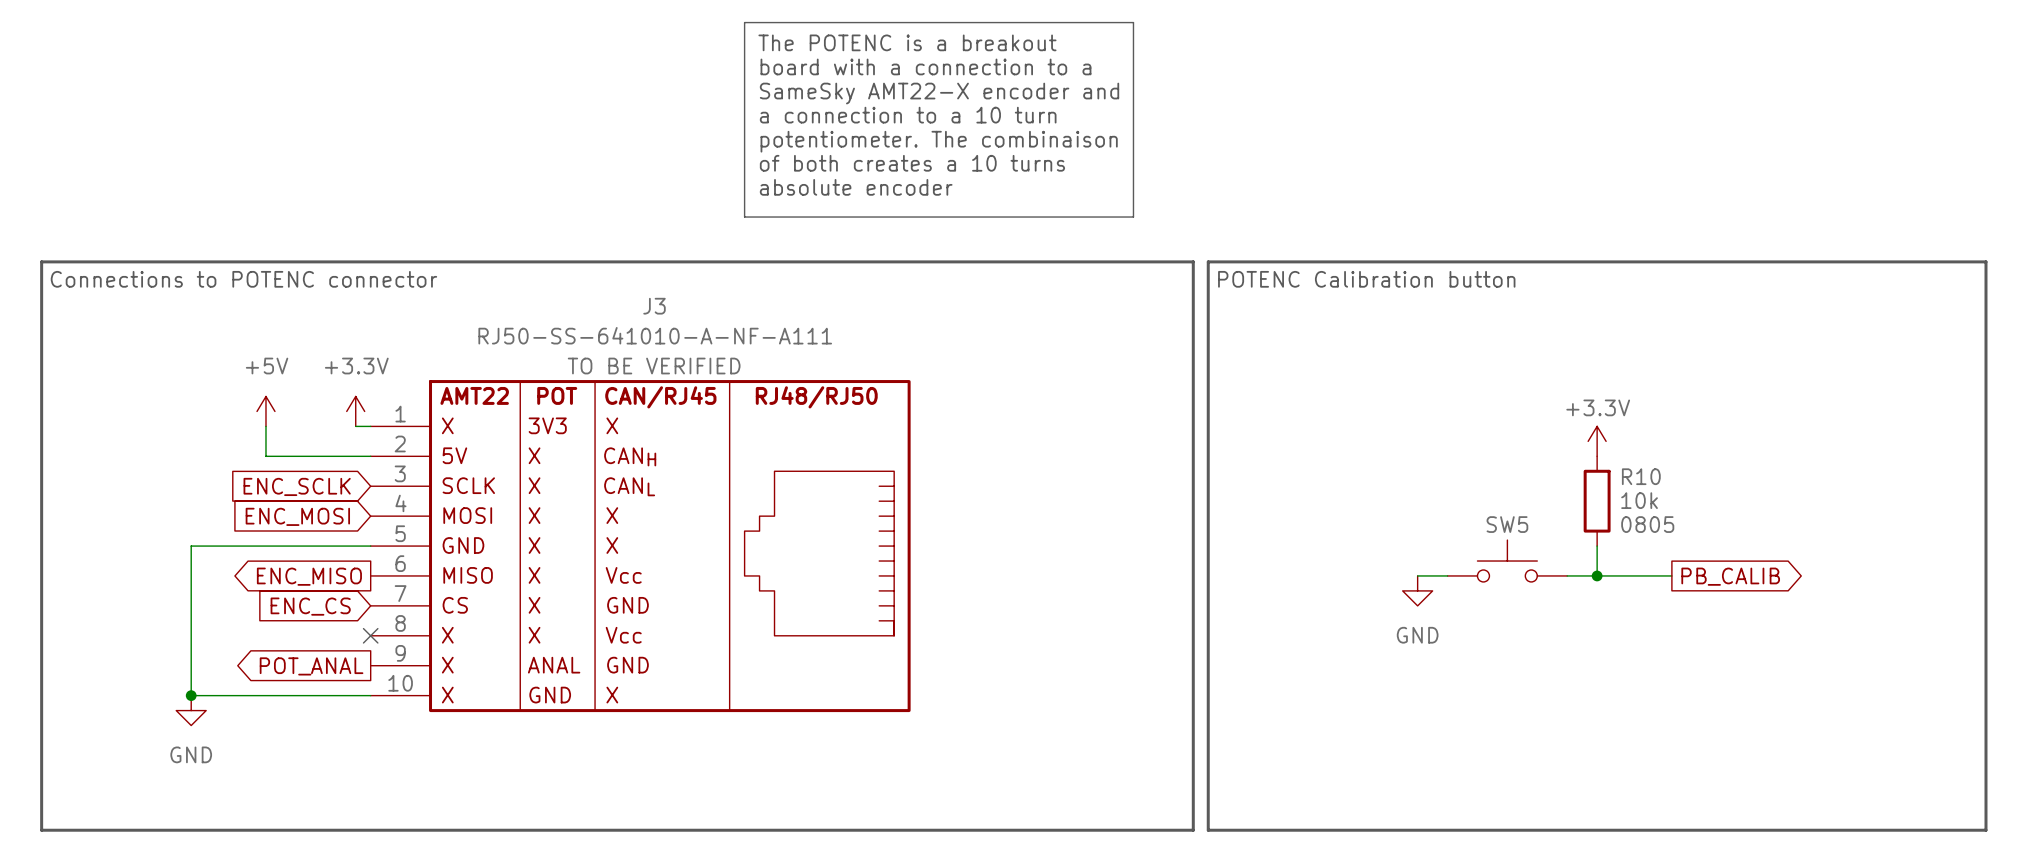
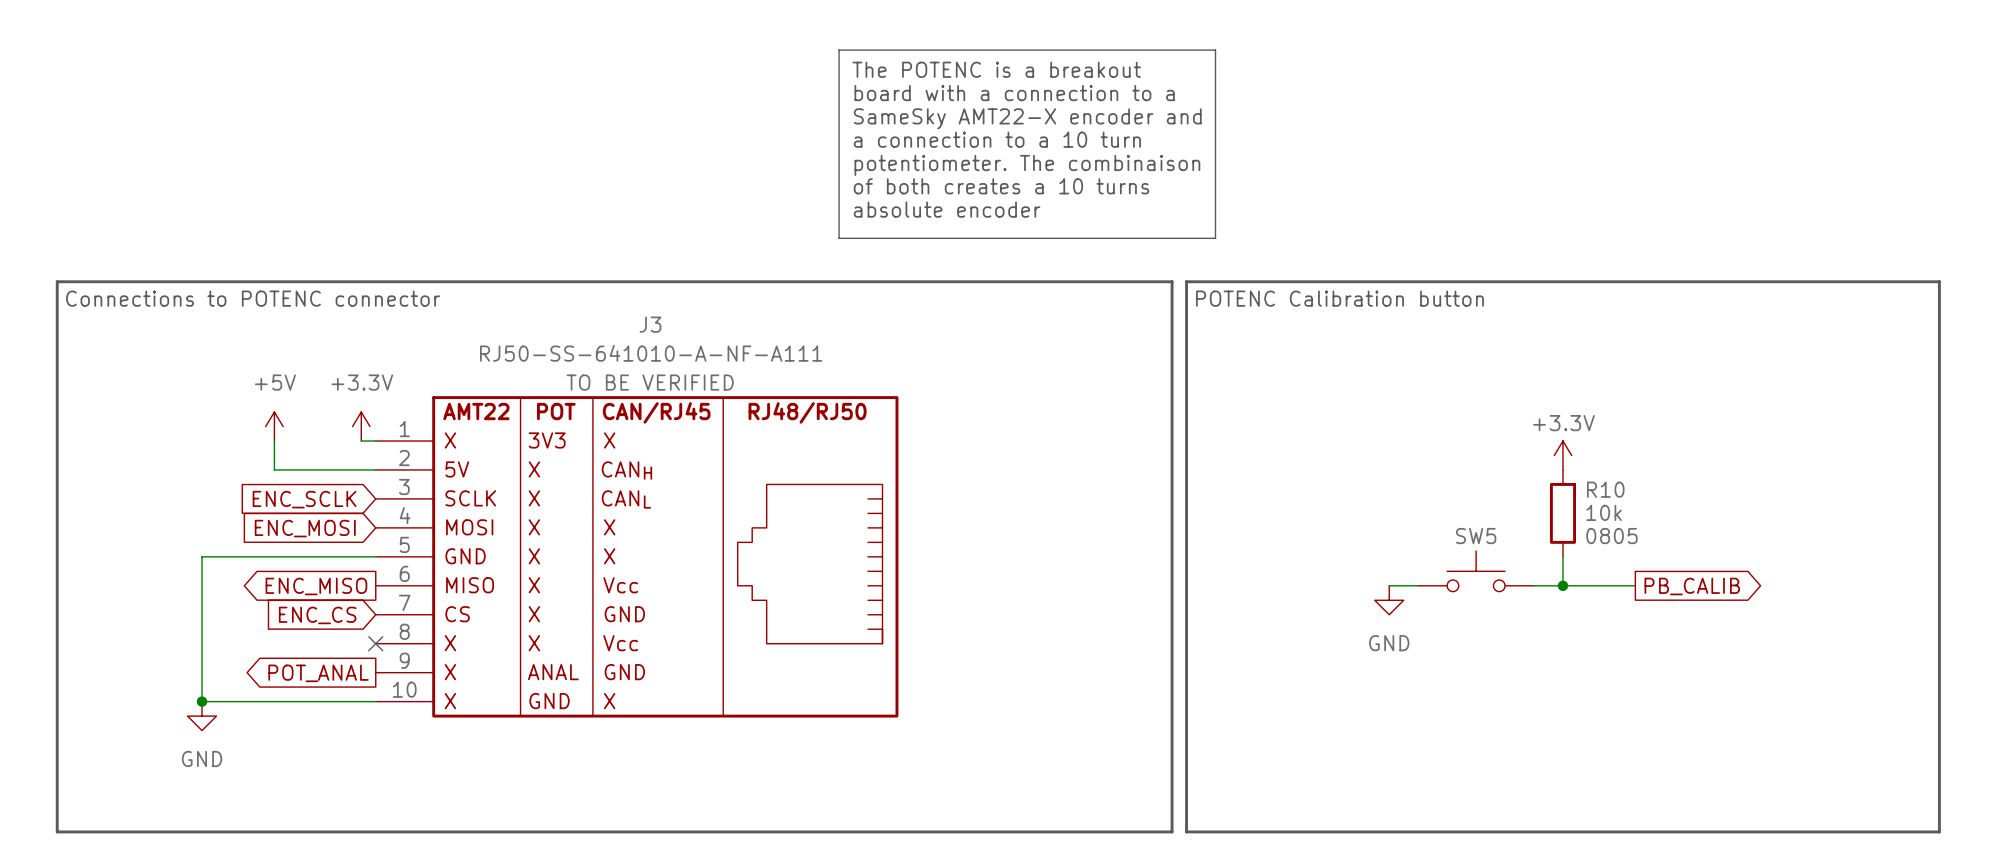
line: (849, 22) (744, 22) (744, 217) (849, 217) -> (839, 50) (839, 238)
line: (1133, 22) (1133, 217) -> (1114, 50) (1215, 50) (1215, 238) (1114, 238)
text position: The POTENC is a breakout (907, 42) -> The POTENC is a breakout (996, 69)
text position: board with a connection to a (925, 66) -> board with a connection to a (1014, 93)
text position: SameSky AMT22-X encoder and (939, 93) -> SameSky AMT22-X encoder and (1027, 118)
text position: a connection to a 10 turn (908, 115) -> a connection to a 10 turn (997, 139)
text position: potentiometer. The combinaison (939, 141) -> potentiometer. The combinaison (1027, 165)
text position: of both creates a 10 turns (912, 163) -> of both creates a 10 turns (1001, 186)
text position: absolute encoder (856, 187) -> absolute encoder (947, 209)

